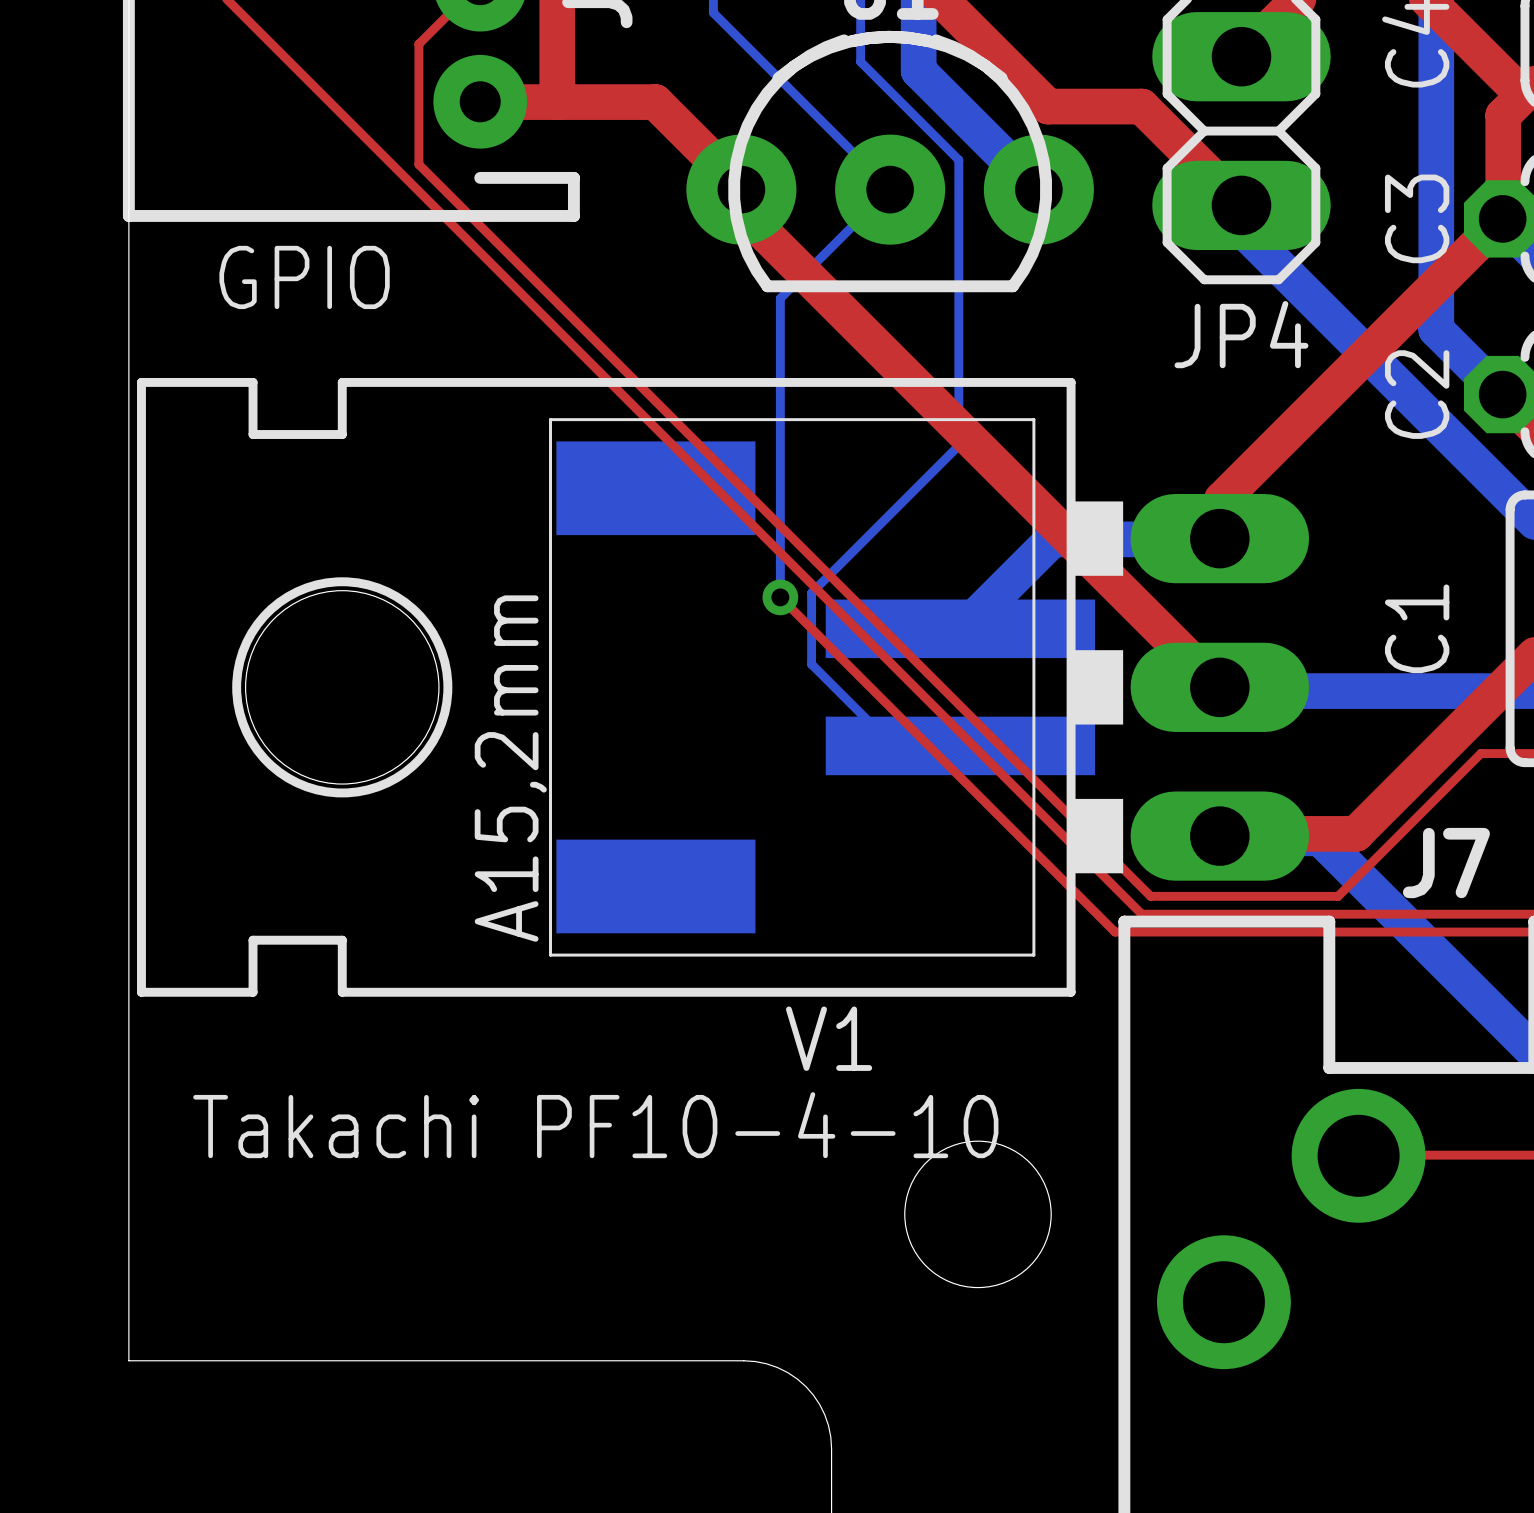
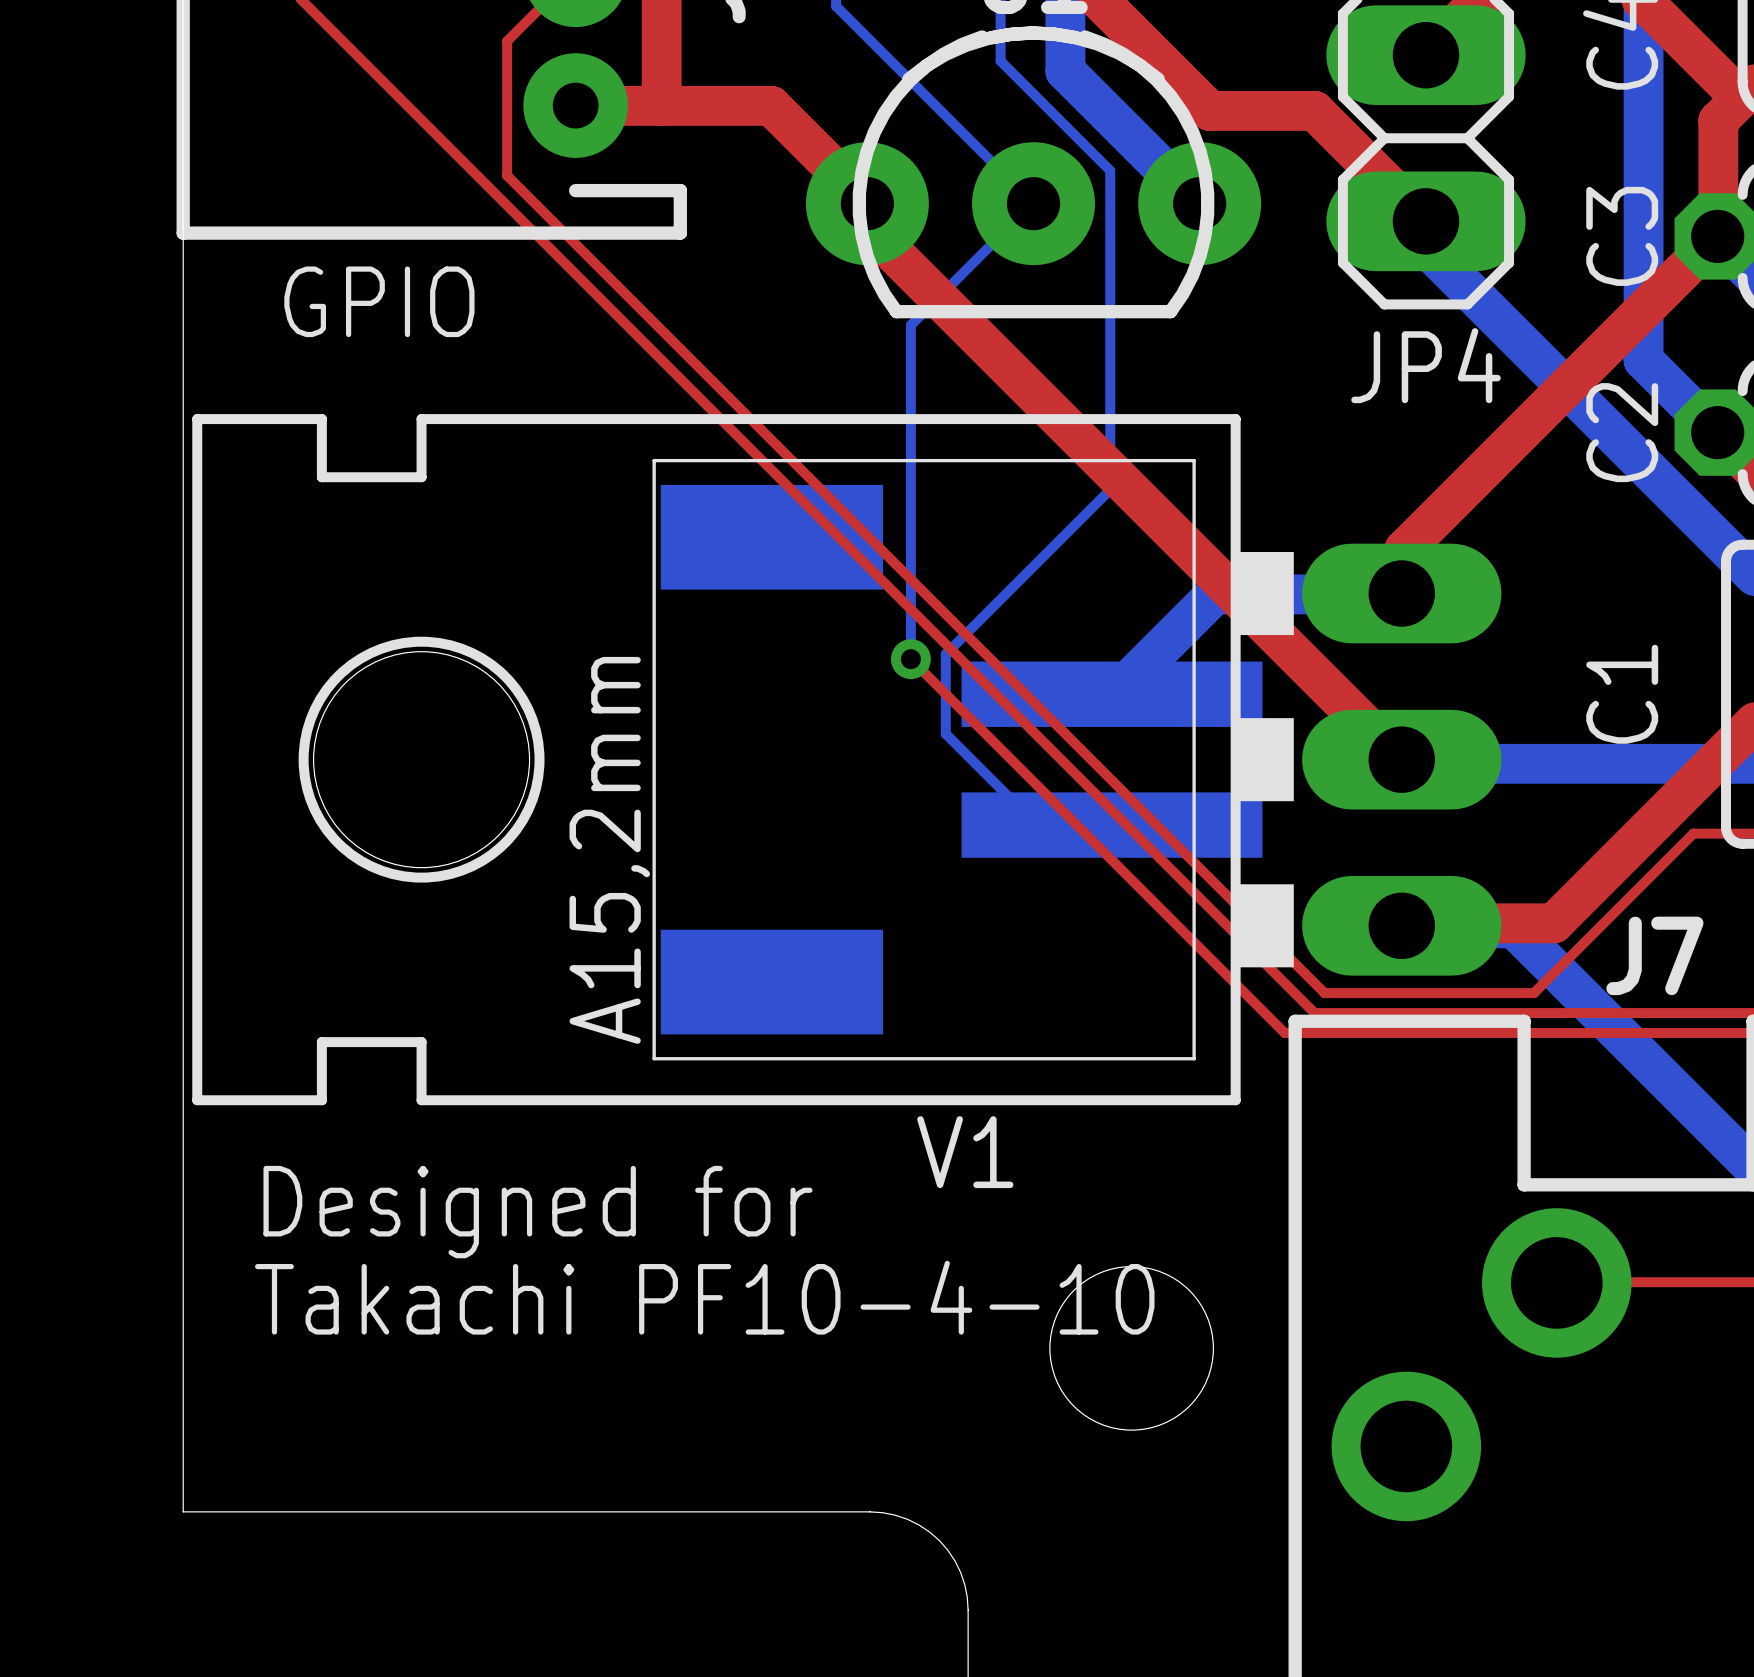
text: none -> Designed for (537, 1212)
text position: Takachi PF10-4-10 (595, 1125) -> Takachi PF10-4-10 (704, 1297)

